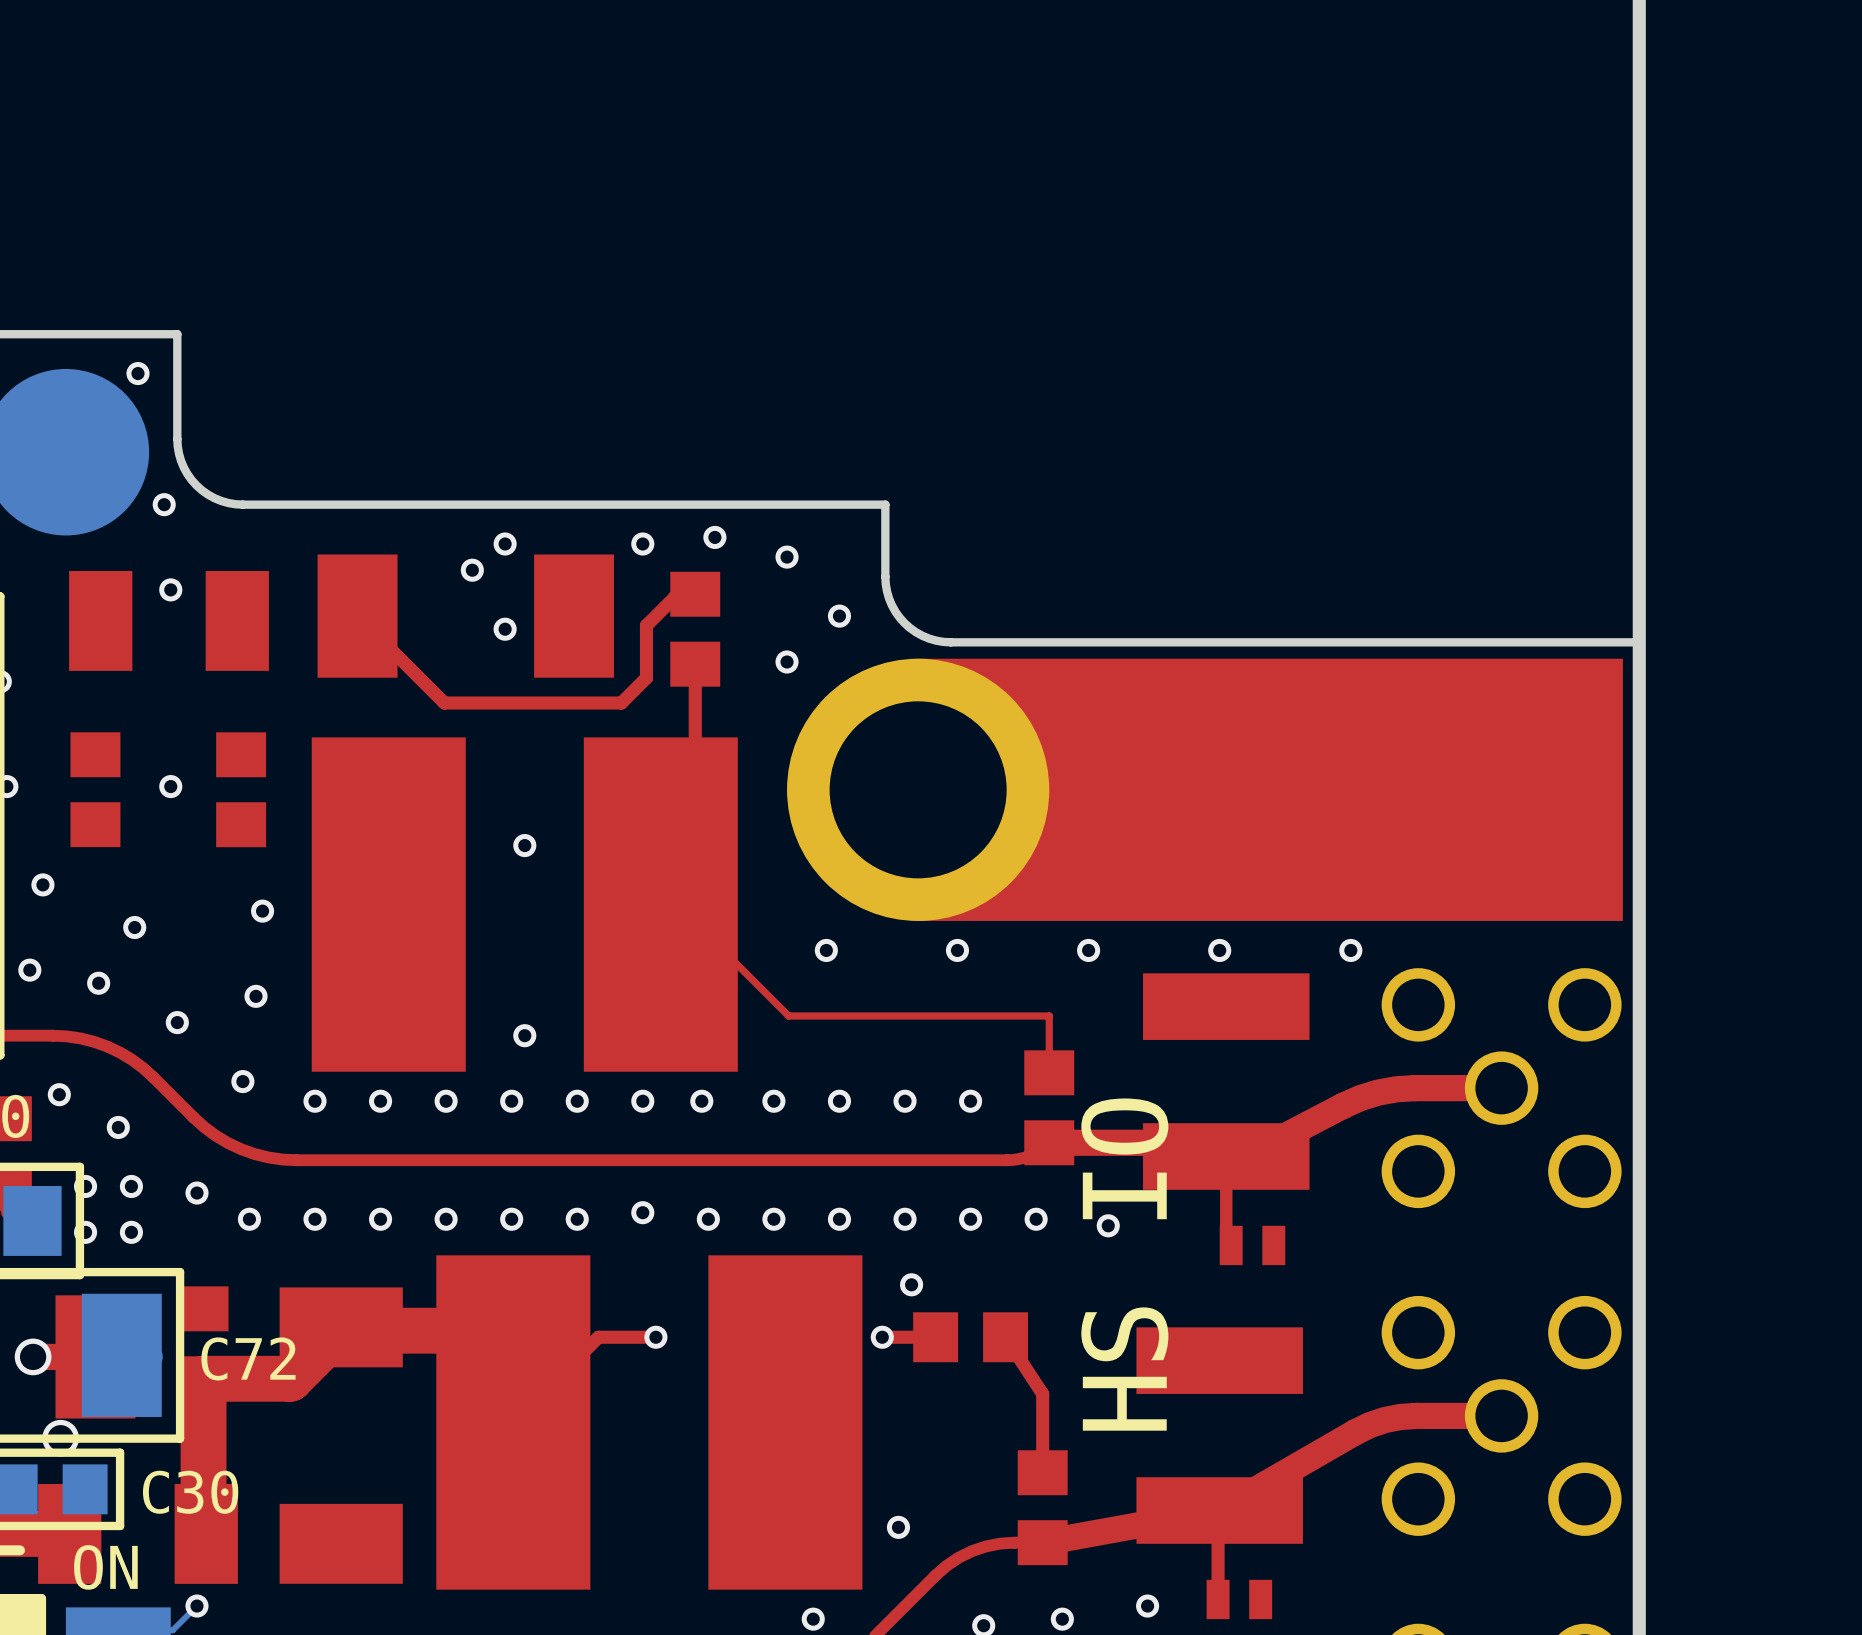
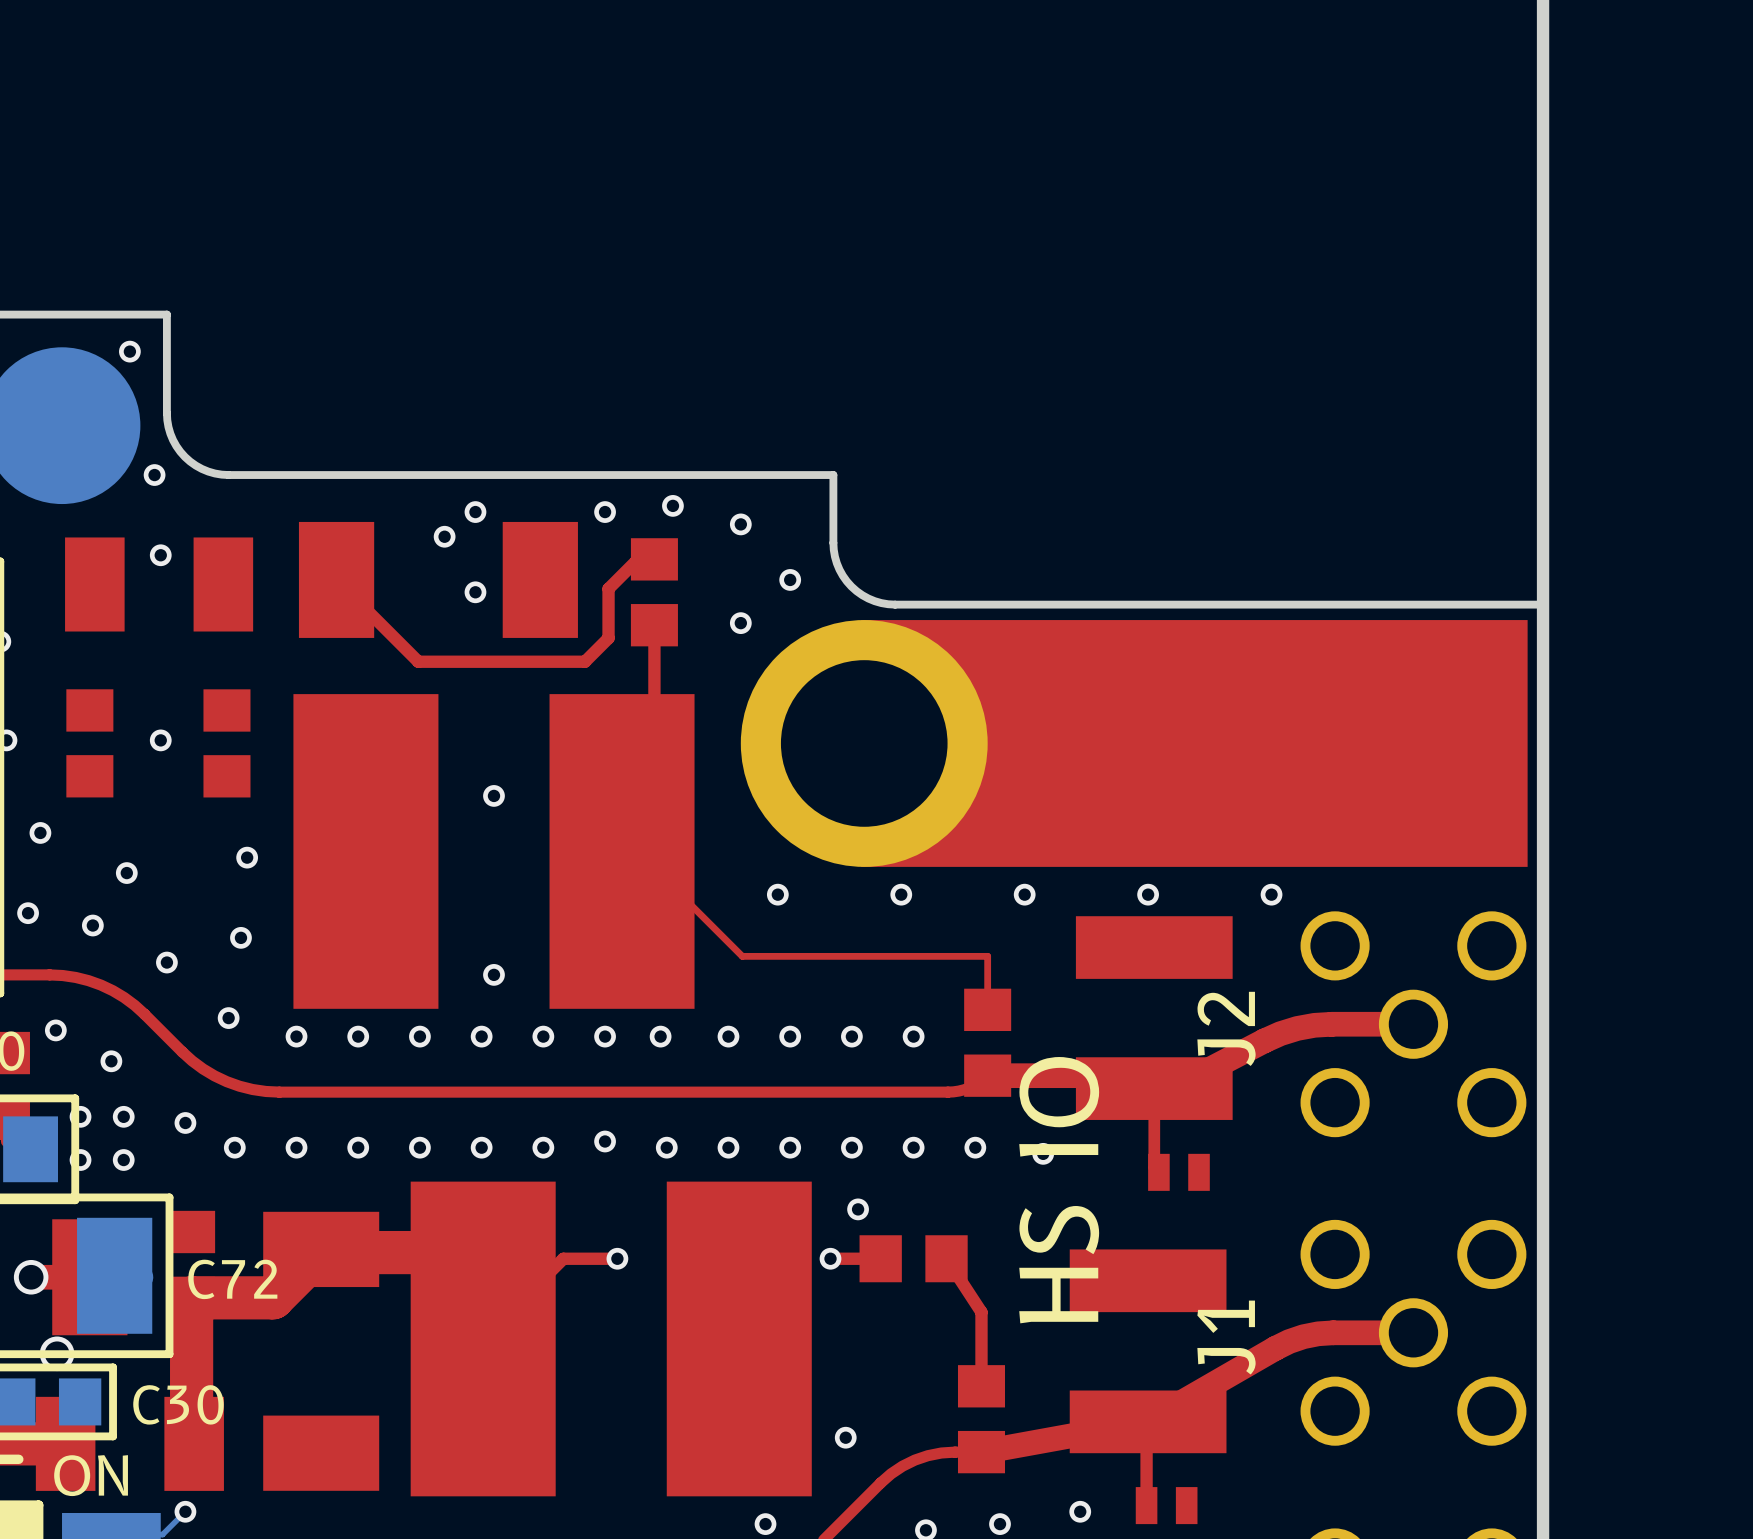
J2 name: none -> J2 (1226, 1028)
J1 name: none -> J1 (1226, 1337)

